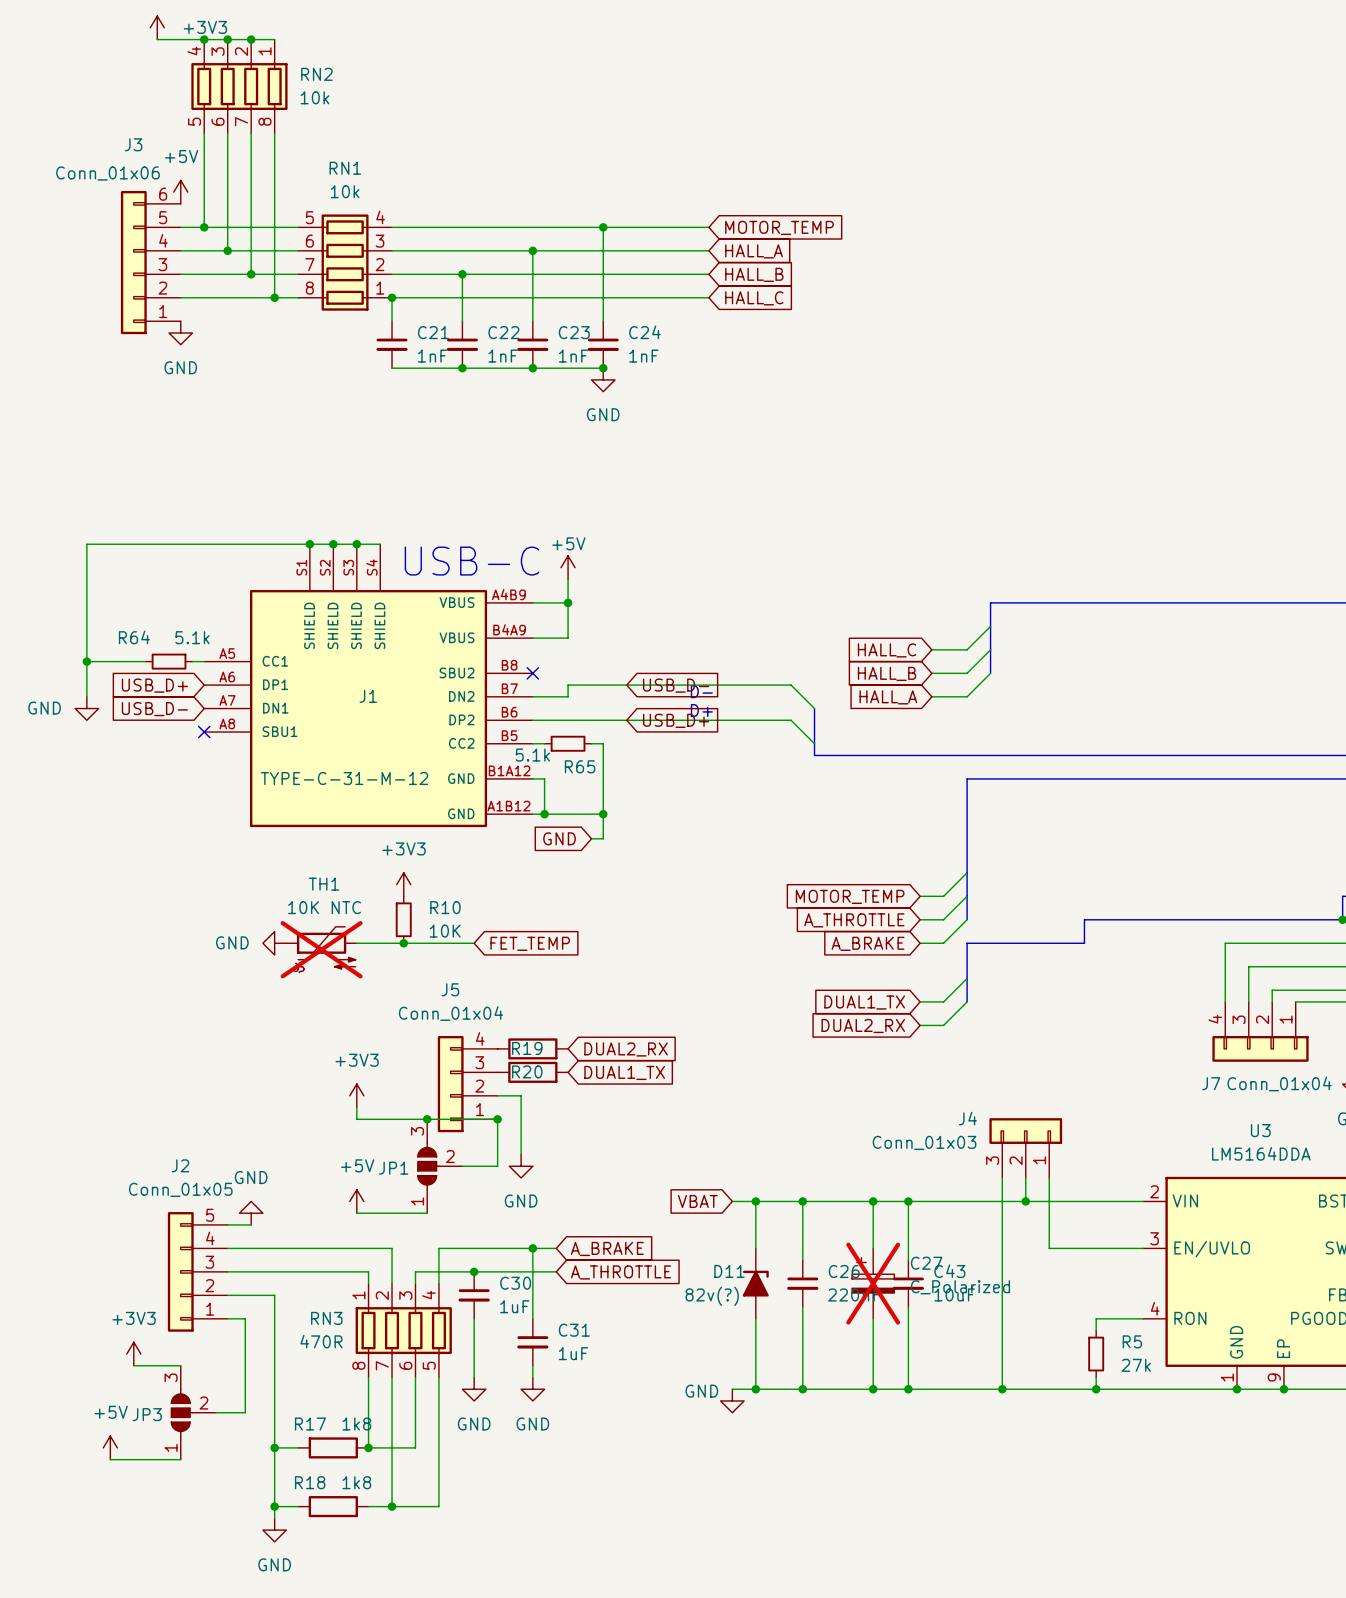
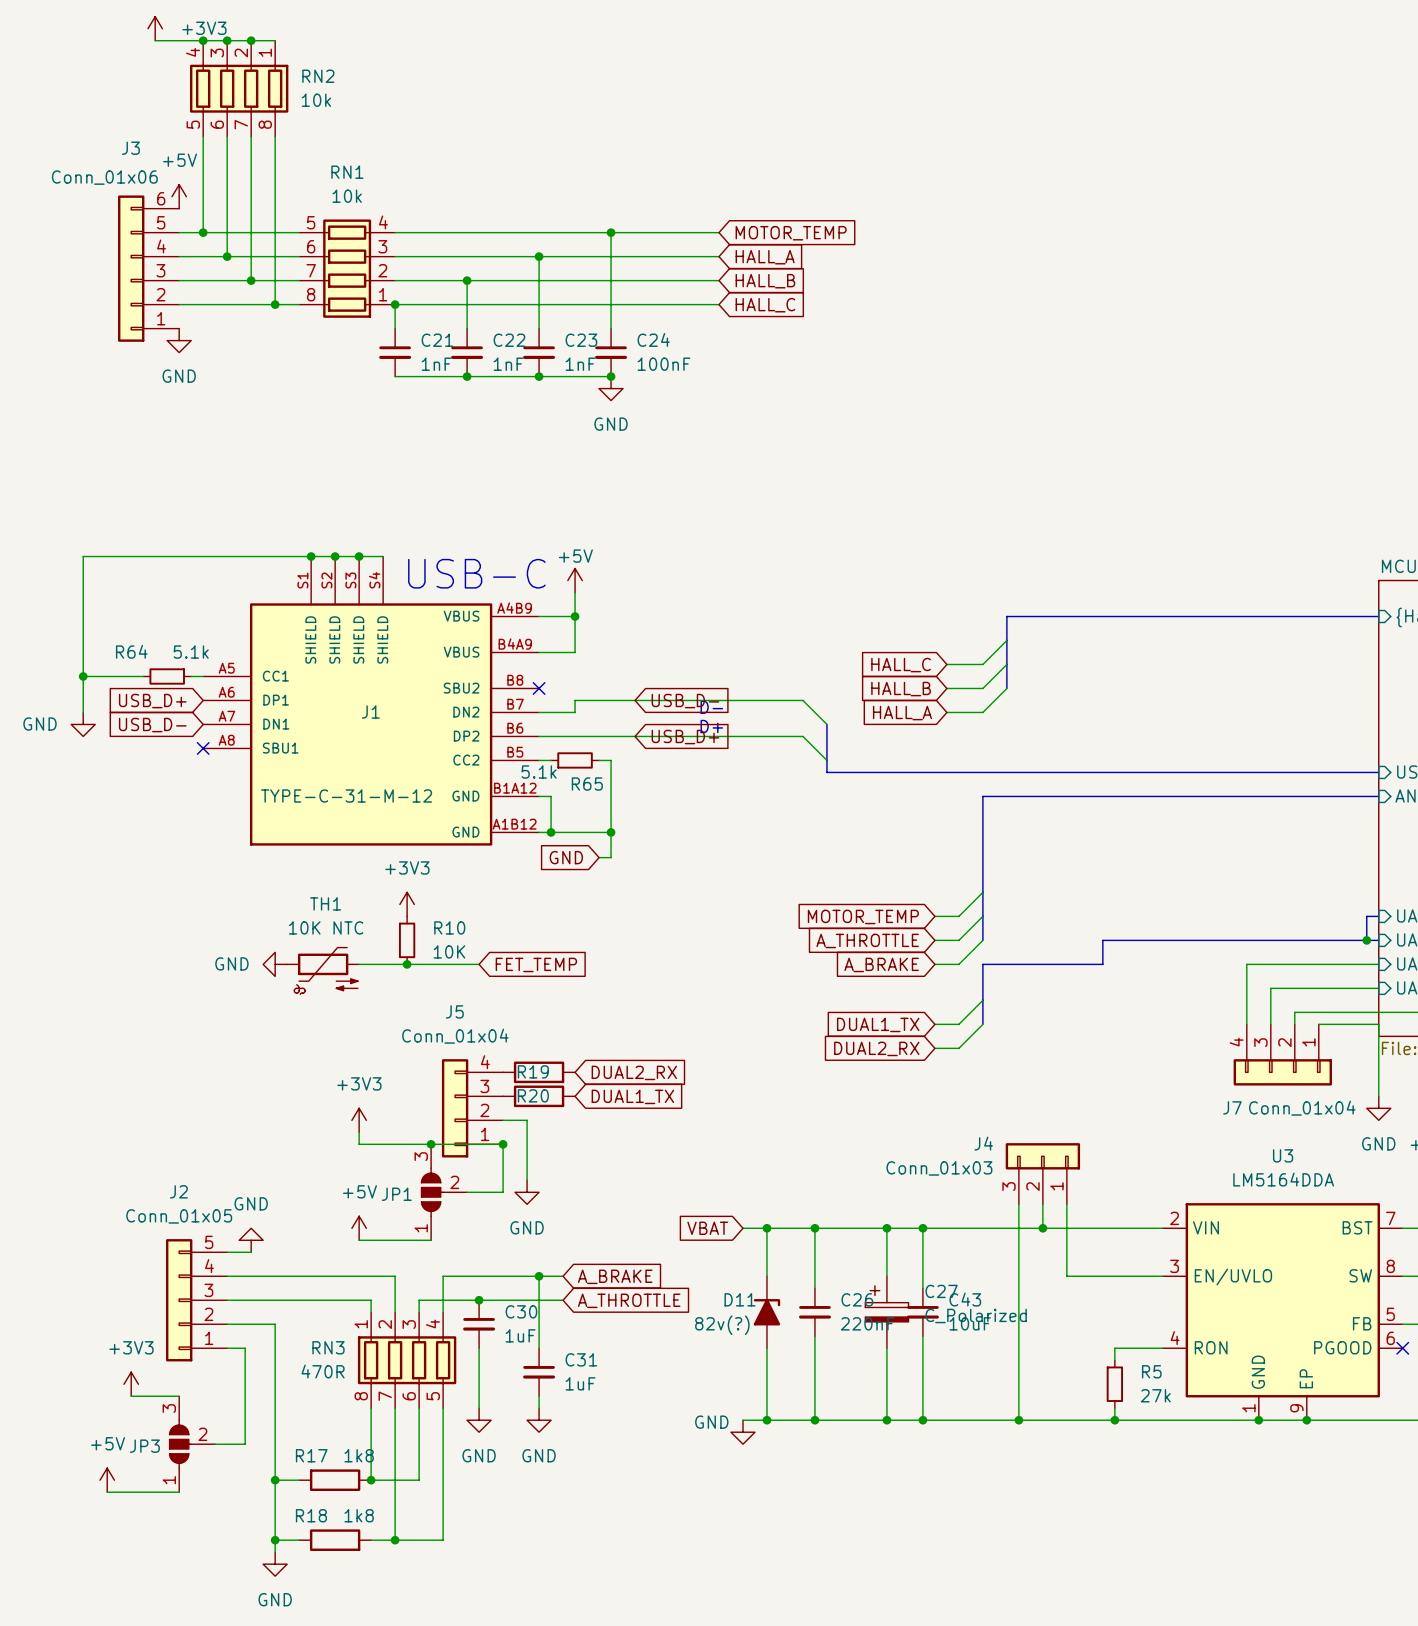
C24 value: 1nF (643, 356) -> 100nF (663, 364)
TH1 do-not-place cross: (321, 949) -> none
C27 do-not-place cross: (873, 1283) -> none

